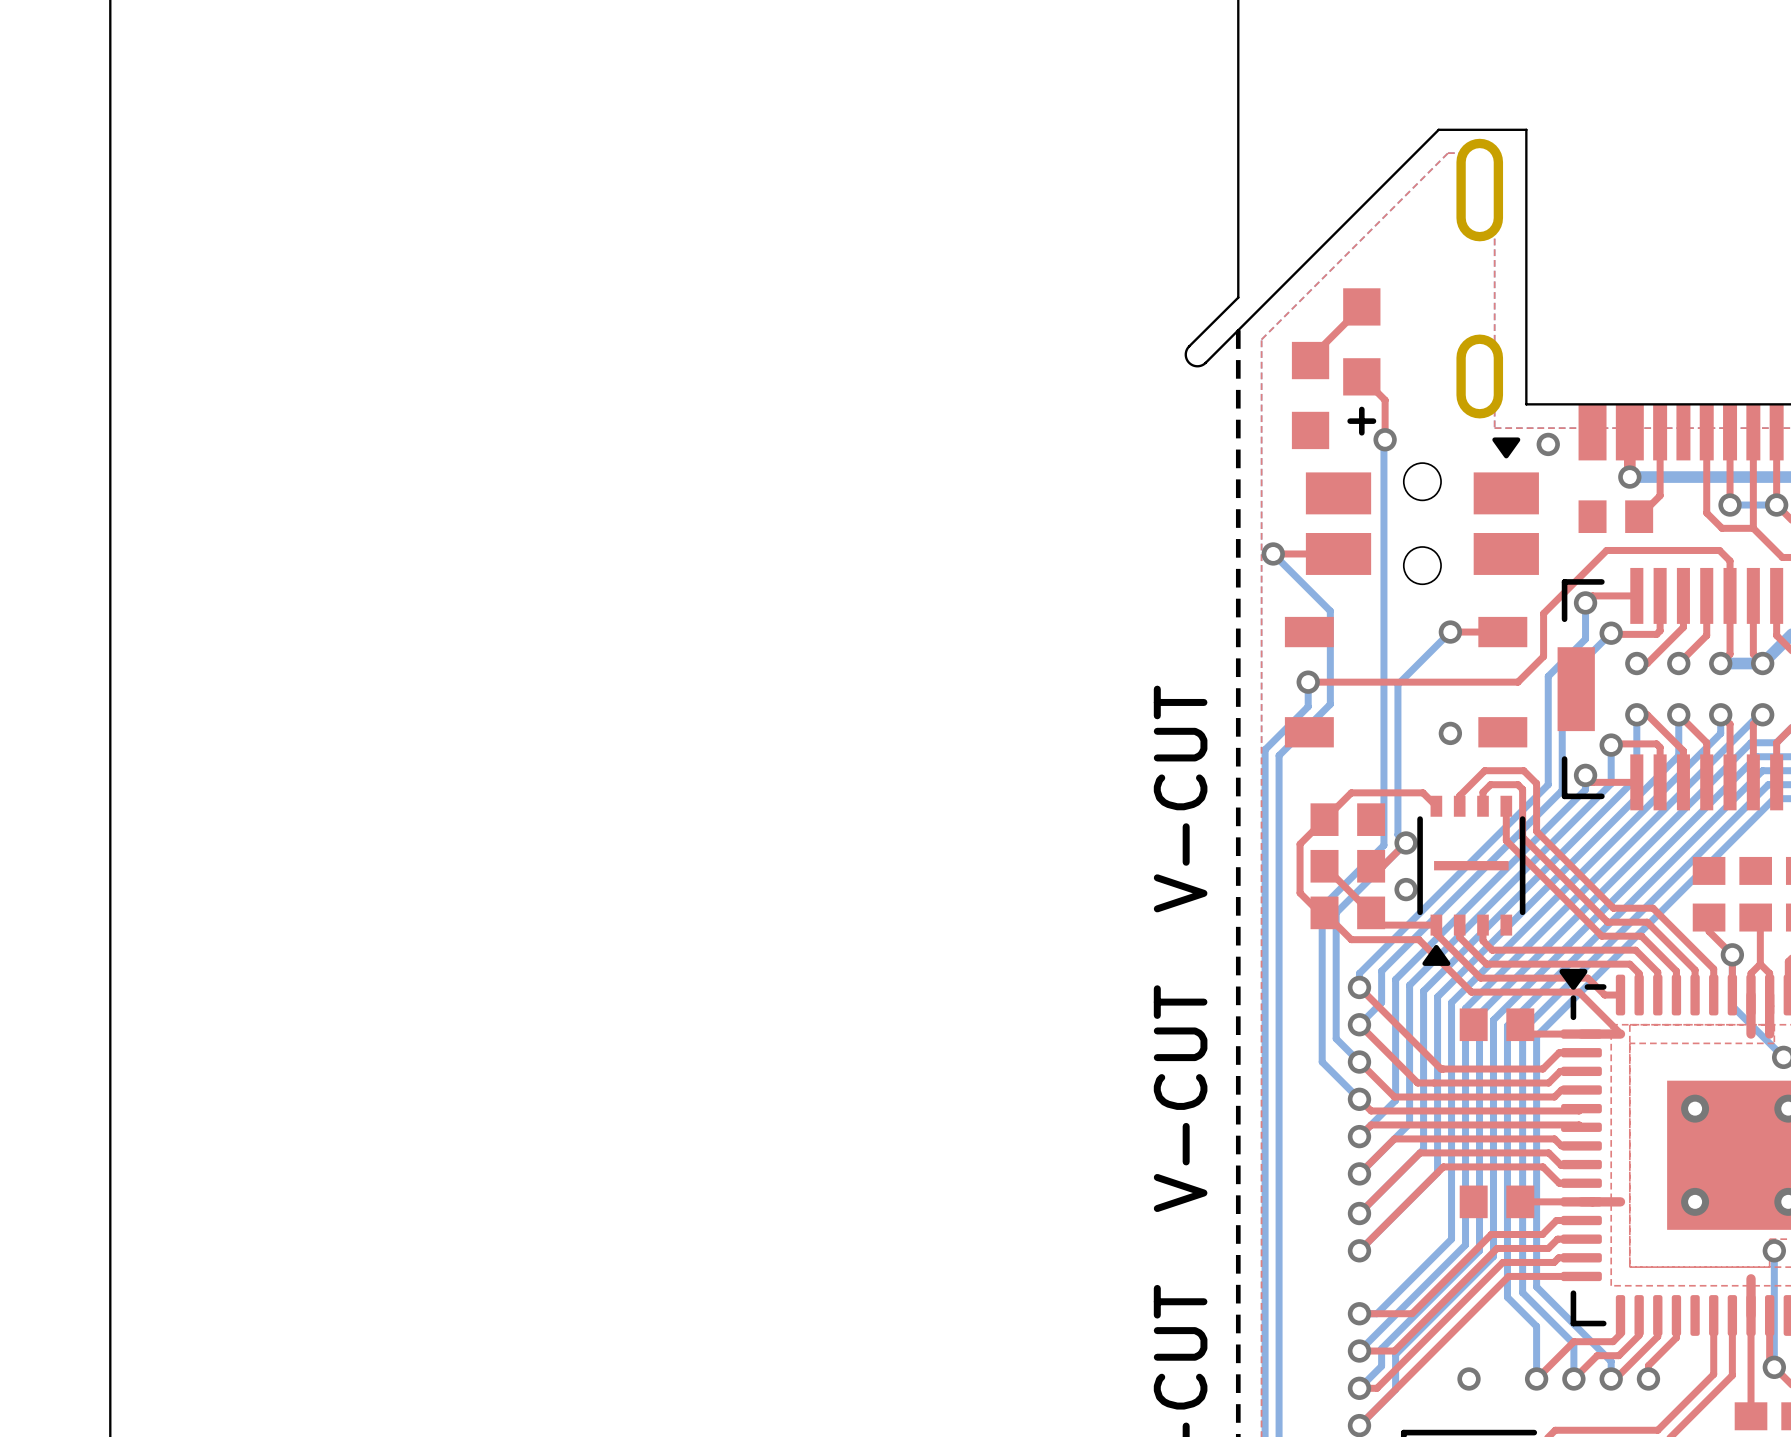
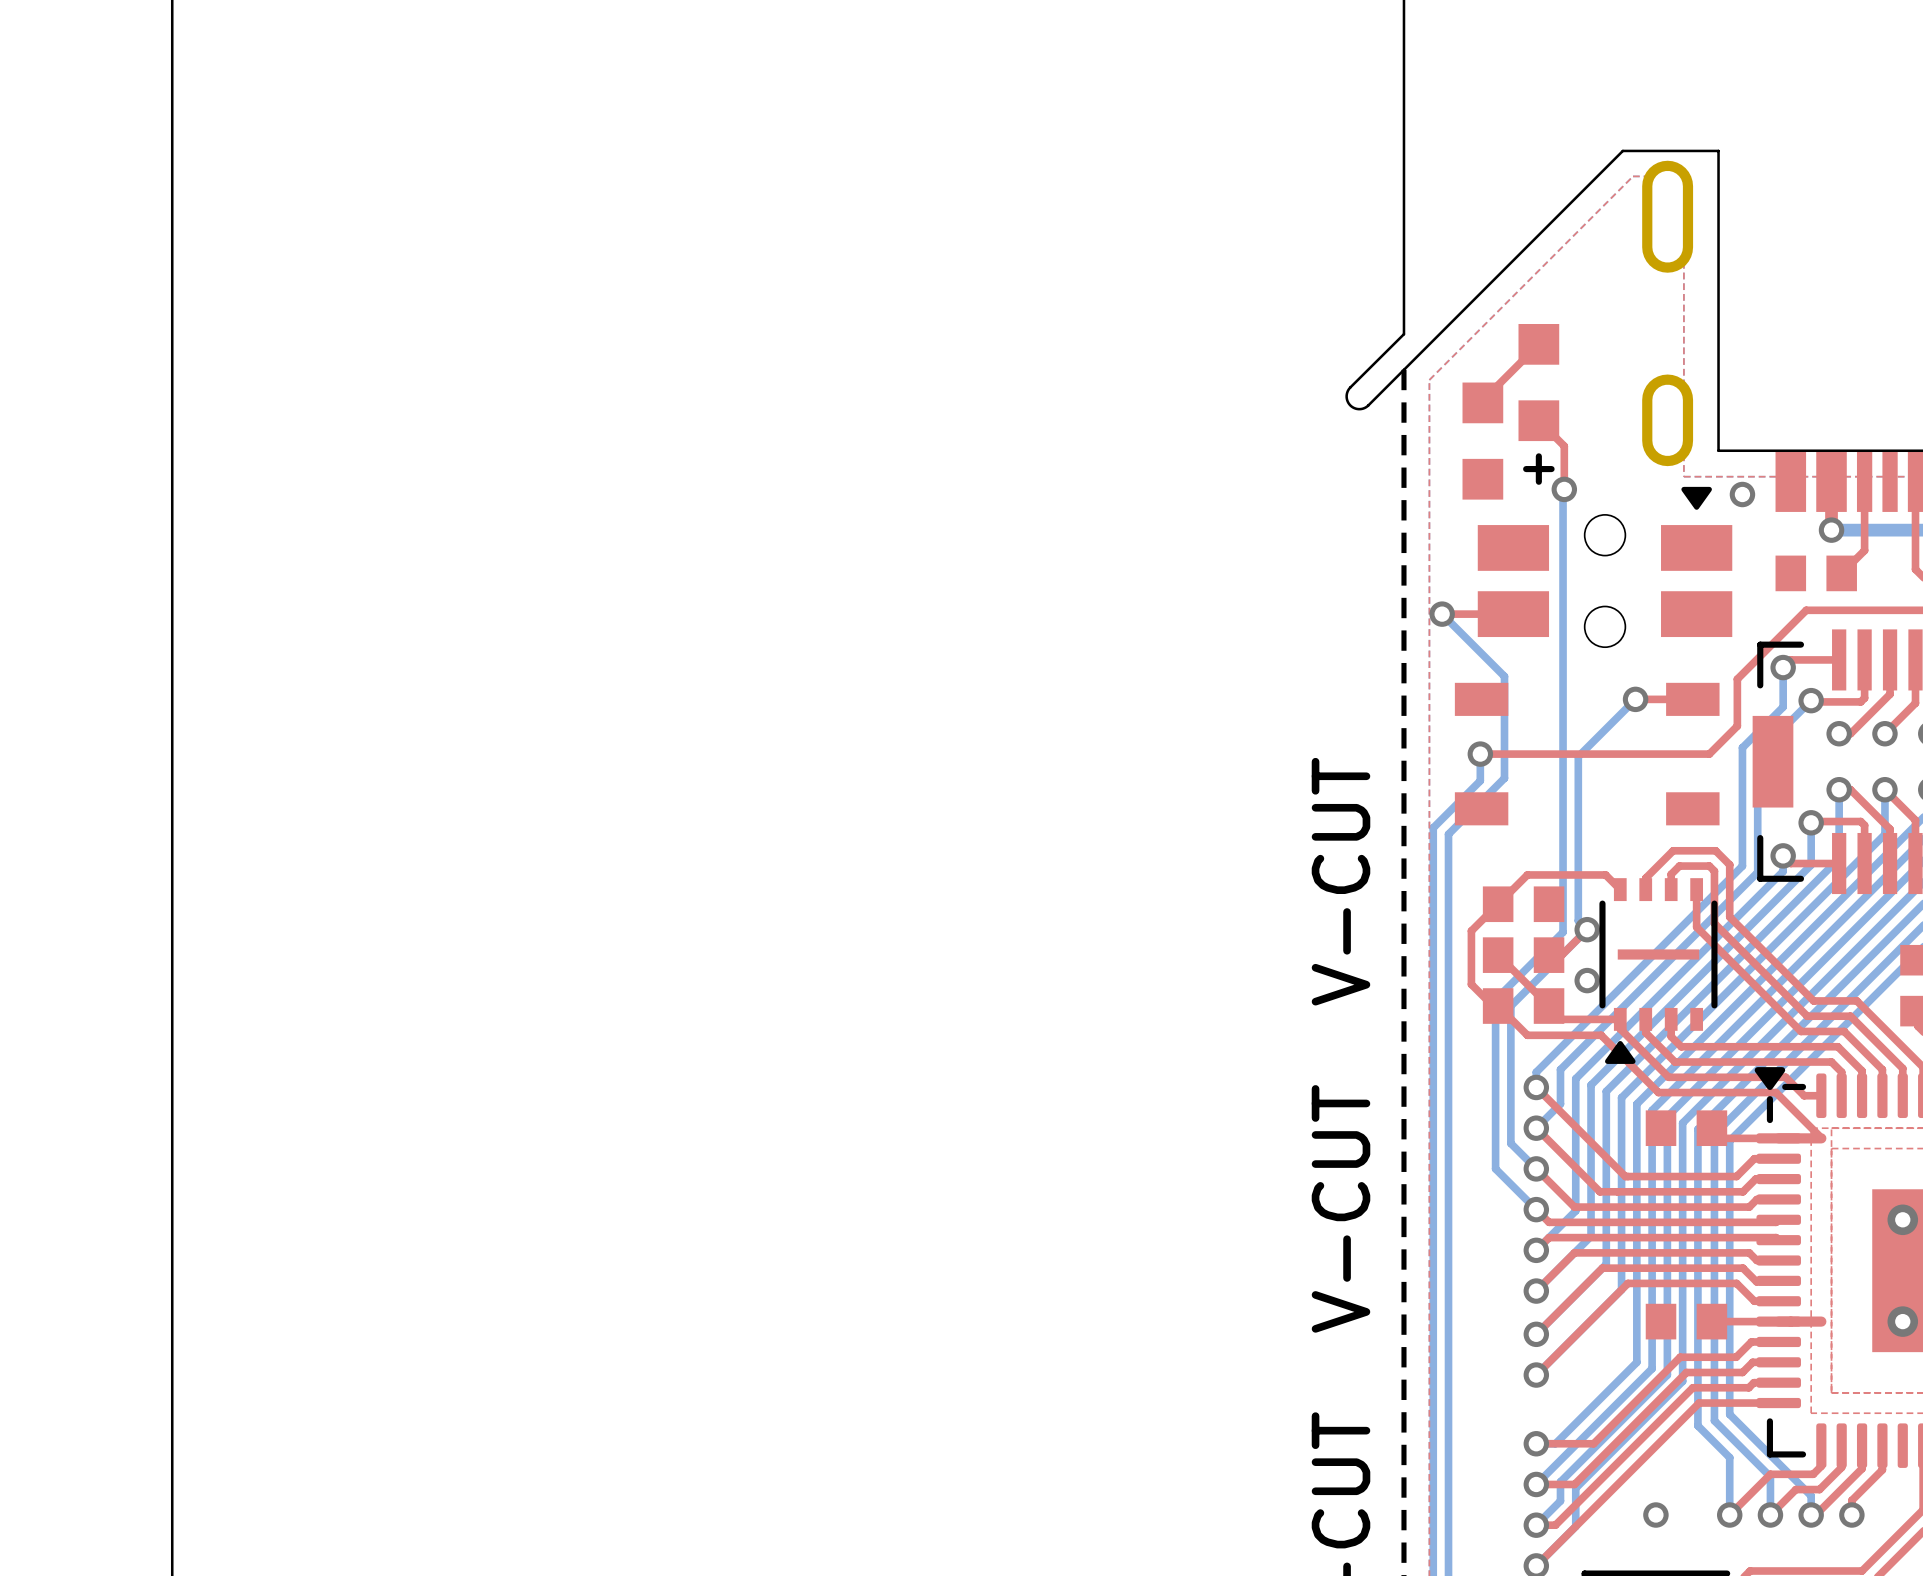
via: (1450, 733) -> none

